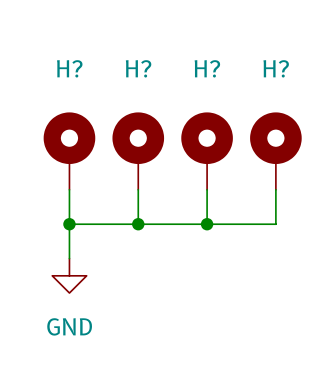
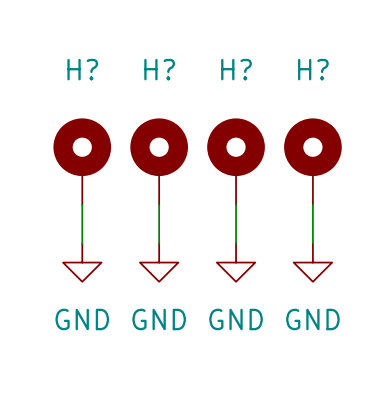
junction: (69, 224) -> none
junction: (138, 224) -> none
junction: (207, 224) -> none
wire: (275, 224) (69, 224) (69, 258) -> none
power symbol: none -> GND (159, 262)
power symbol: none -> GND (236, 262)
power symbol: none -> GND (312, 262)
power symbol position: GND (69, 275) -> GND (82, 262)

